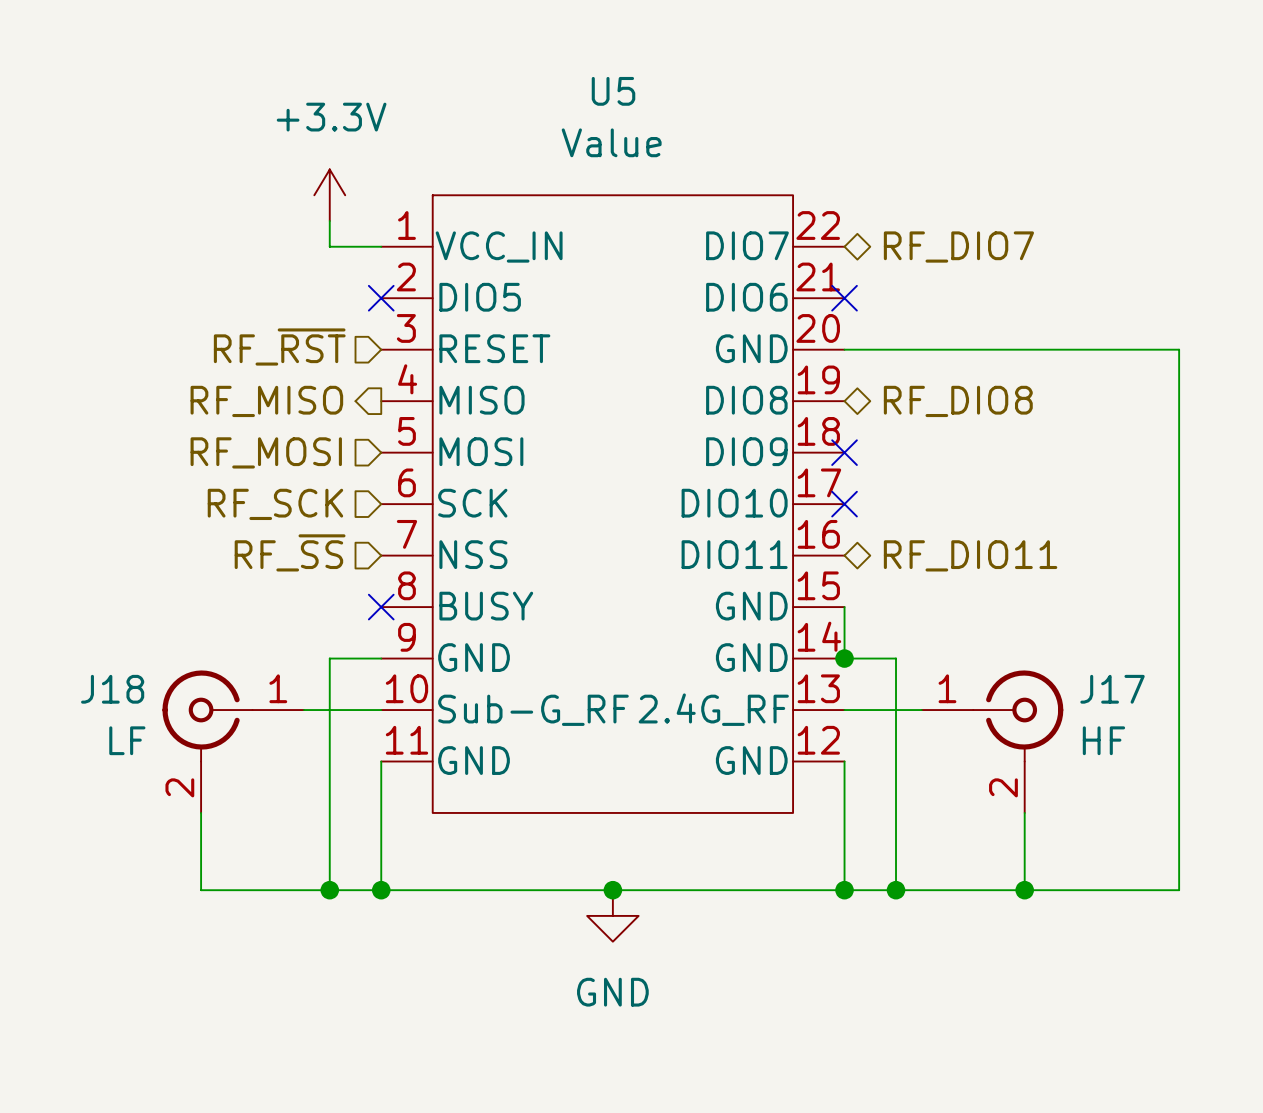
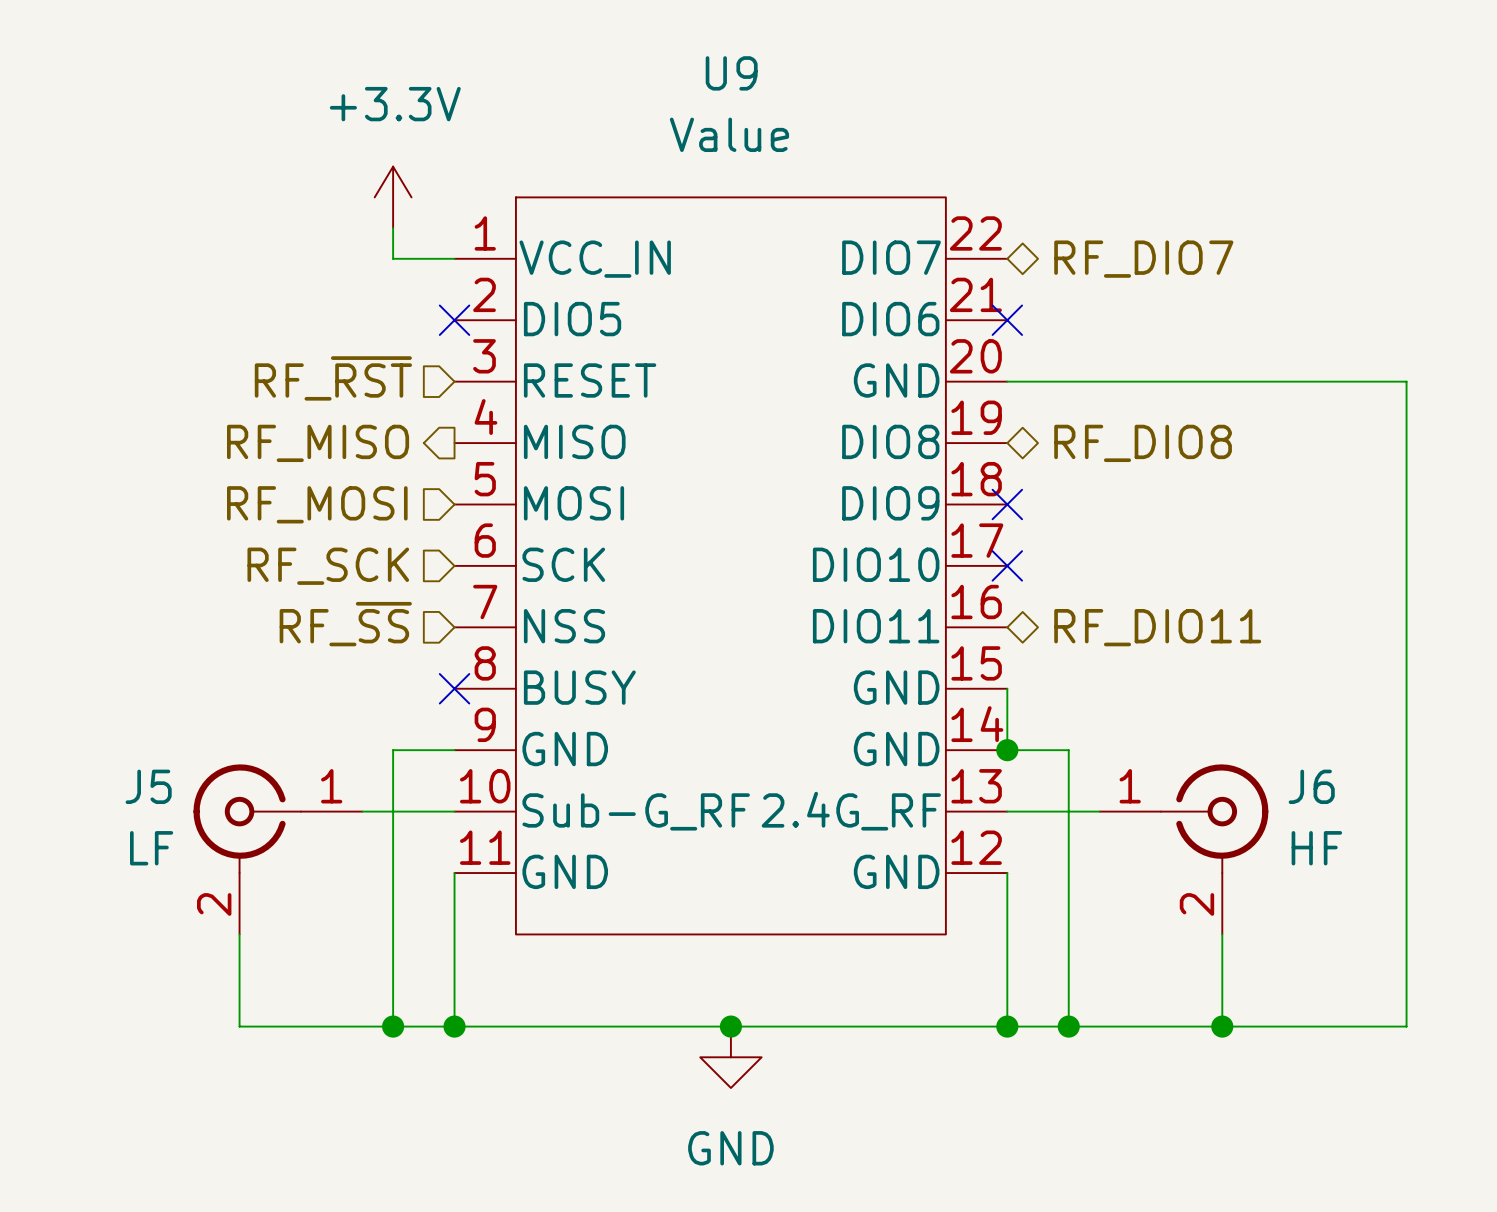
U5 name: U5 (613, 91) -> U9 (731, 73)
J18 name: J18 (112, 689) -> J5 (148, 786)
J17 name: J17 (1112, 689) -> J6 (1311, 786)

